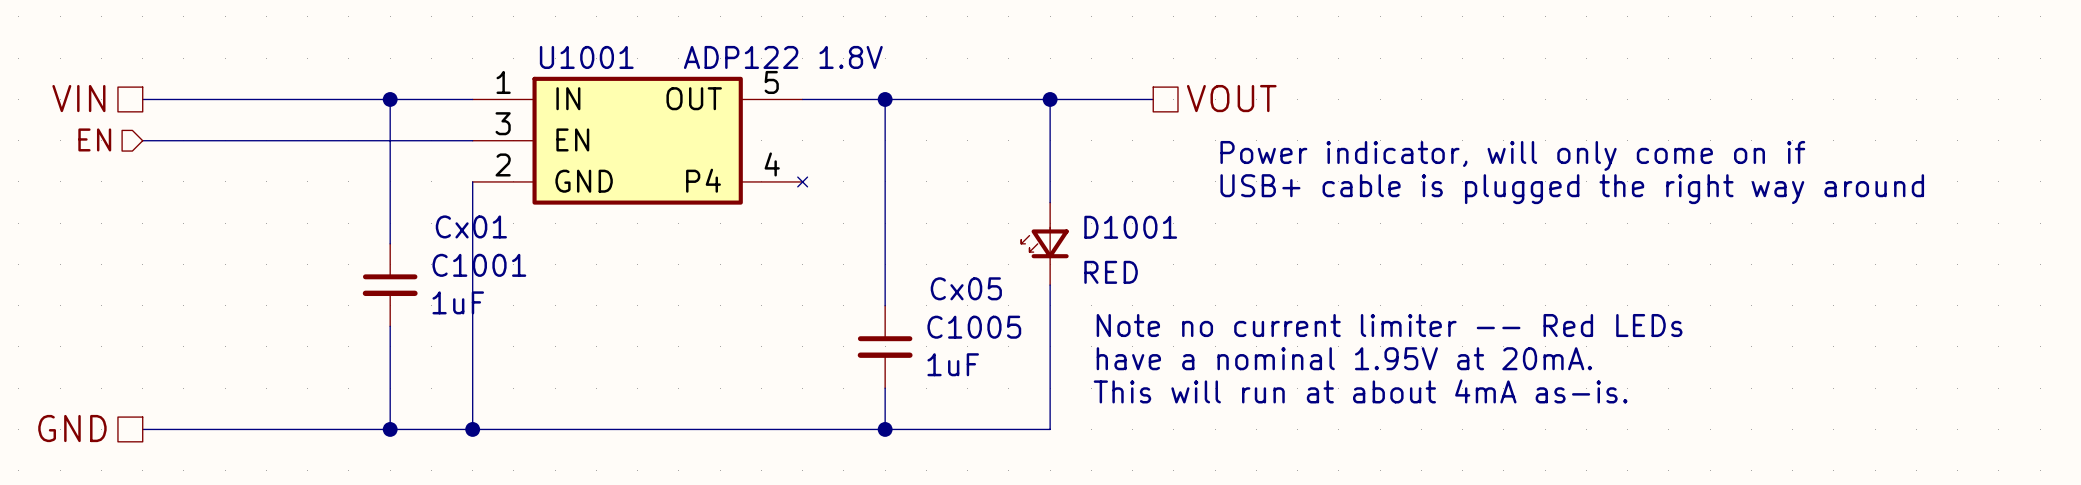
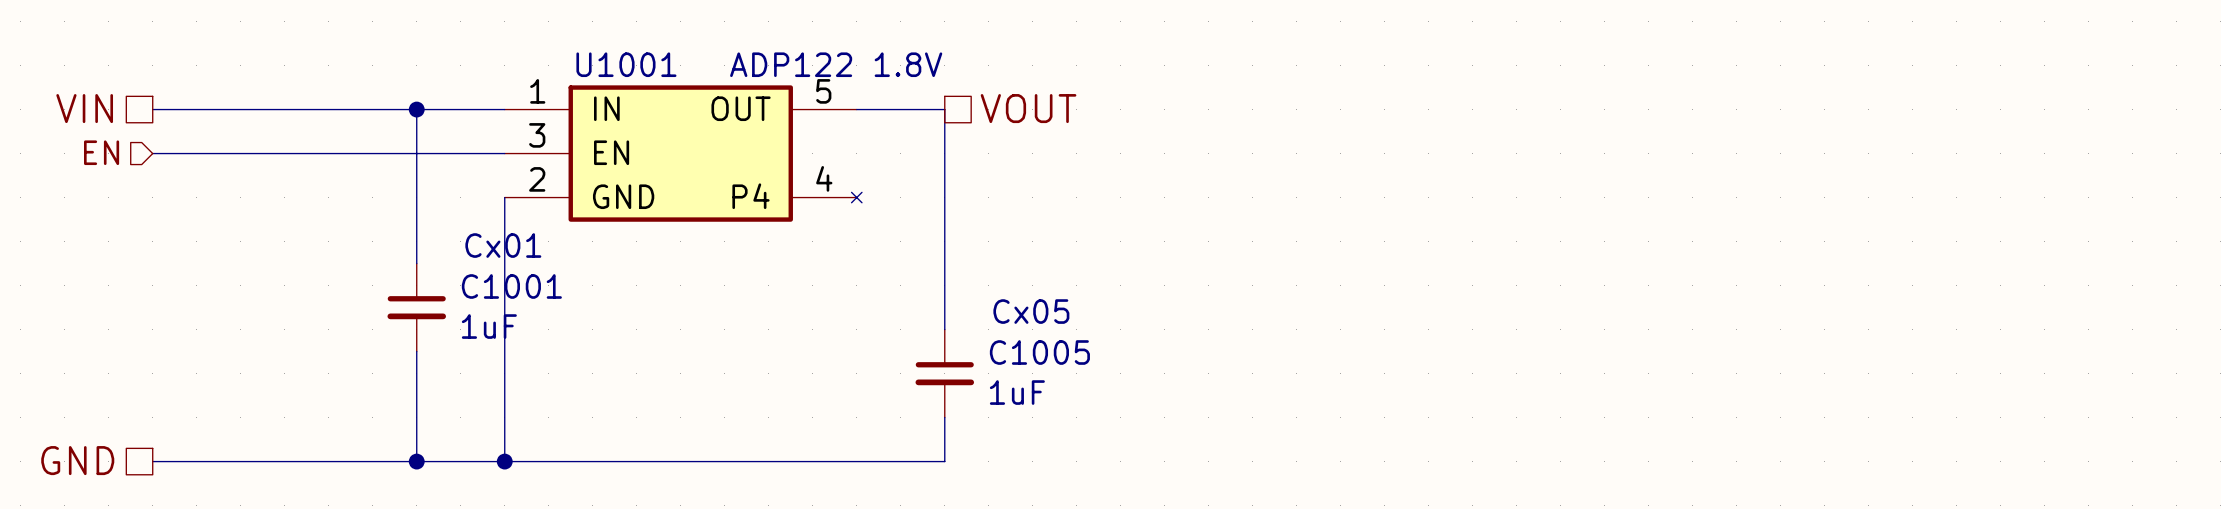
hierarchical label position: VOUT (1231, 98) -> VOUT (1028, 108)
wire: (885, 99) (1153, 99) -> none
junction: (885, 99) -> none
wire: (1050, 99) (1050, 202) -> none
junction: (1050, 99) -> none
text: Power indicator, will only come on if (1512, 155) -> none
text: USB+ cable is plugged the right way around (1572, 189) -> none
D1001: RED (1044, 243) -> none
wire: (1050, 285) (1050, 429) (885, 429) -> none
text: Note no current limiter -- Red LEDs (1389, 325) -> none
text: have a nominal 1.95V at 20mA. (1344, 358) -> none
text: This will run at about 4mA as-is. (1360, 391) -> none
junction: (885, 429) -> none

